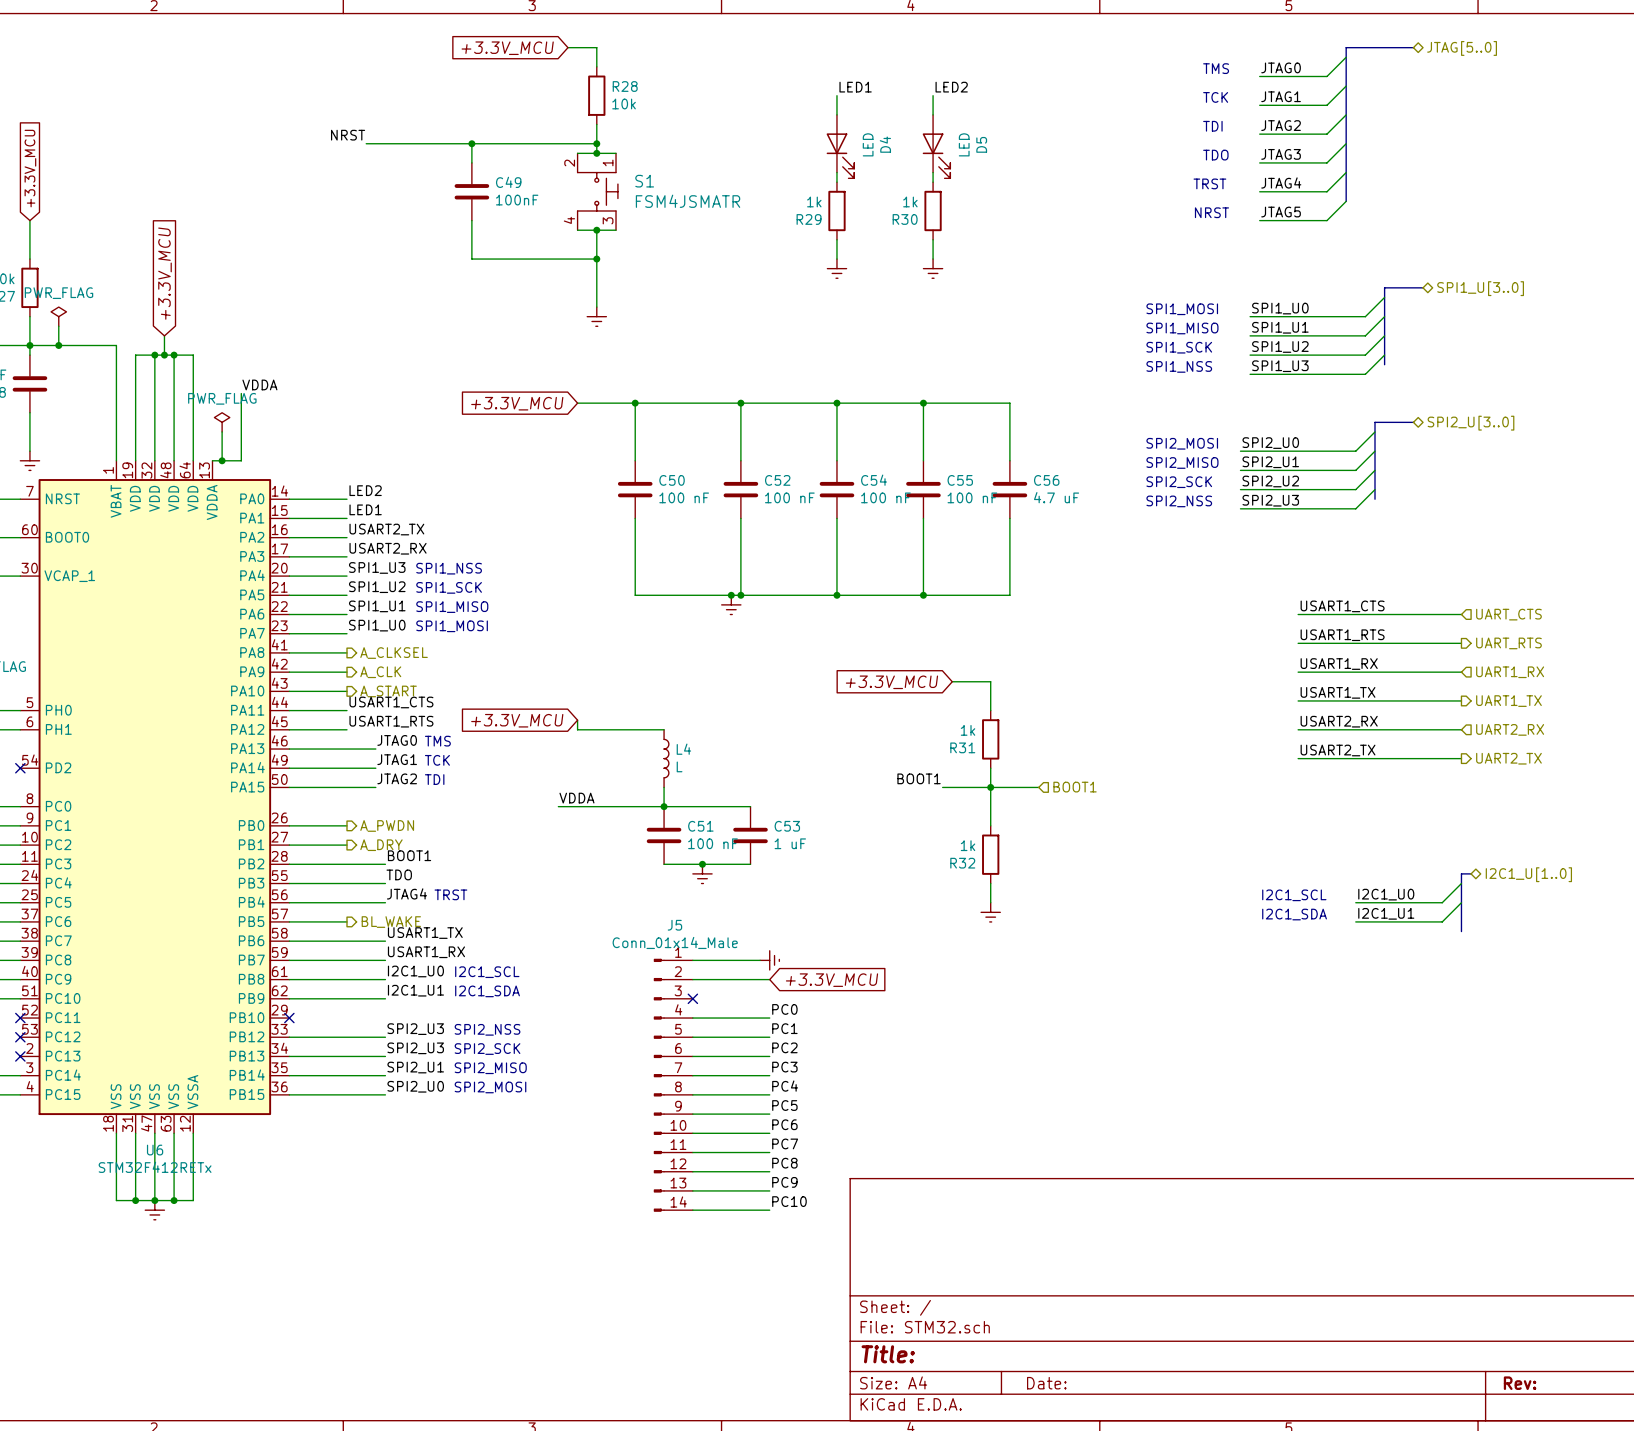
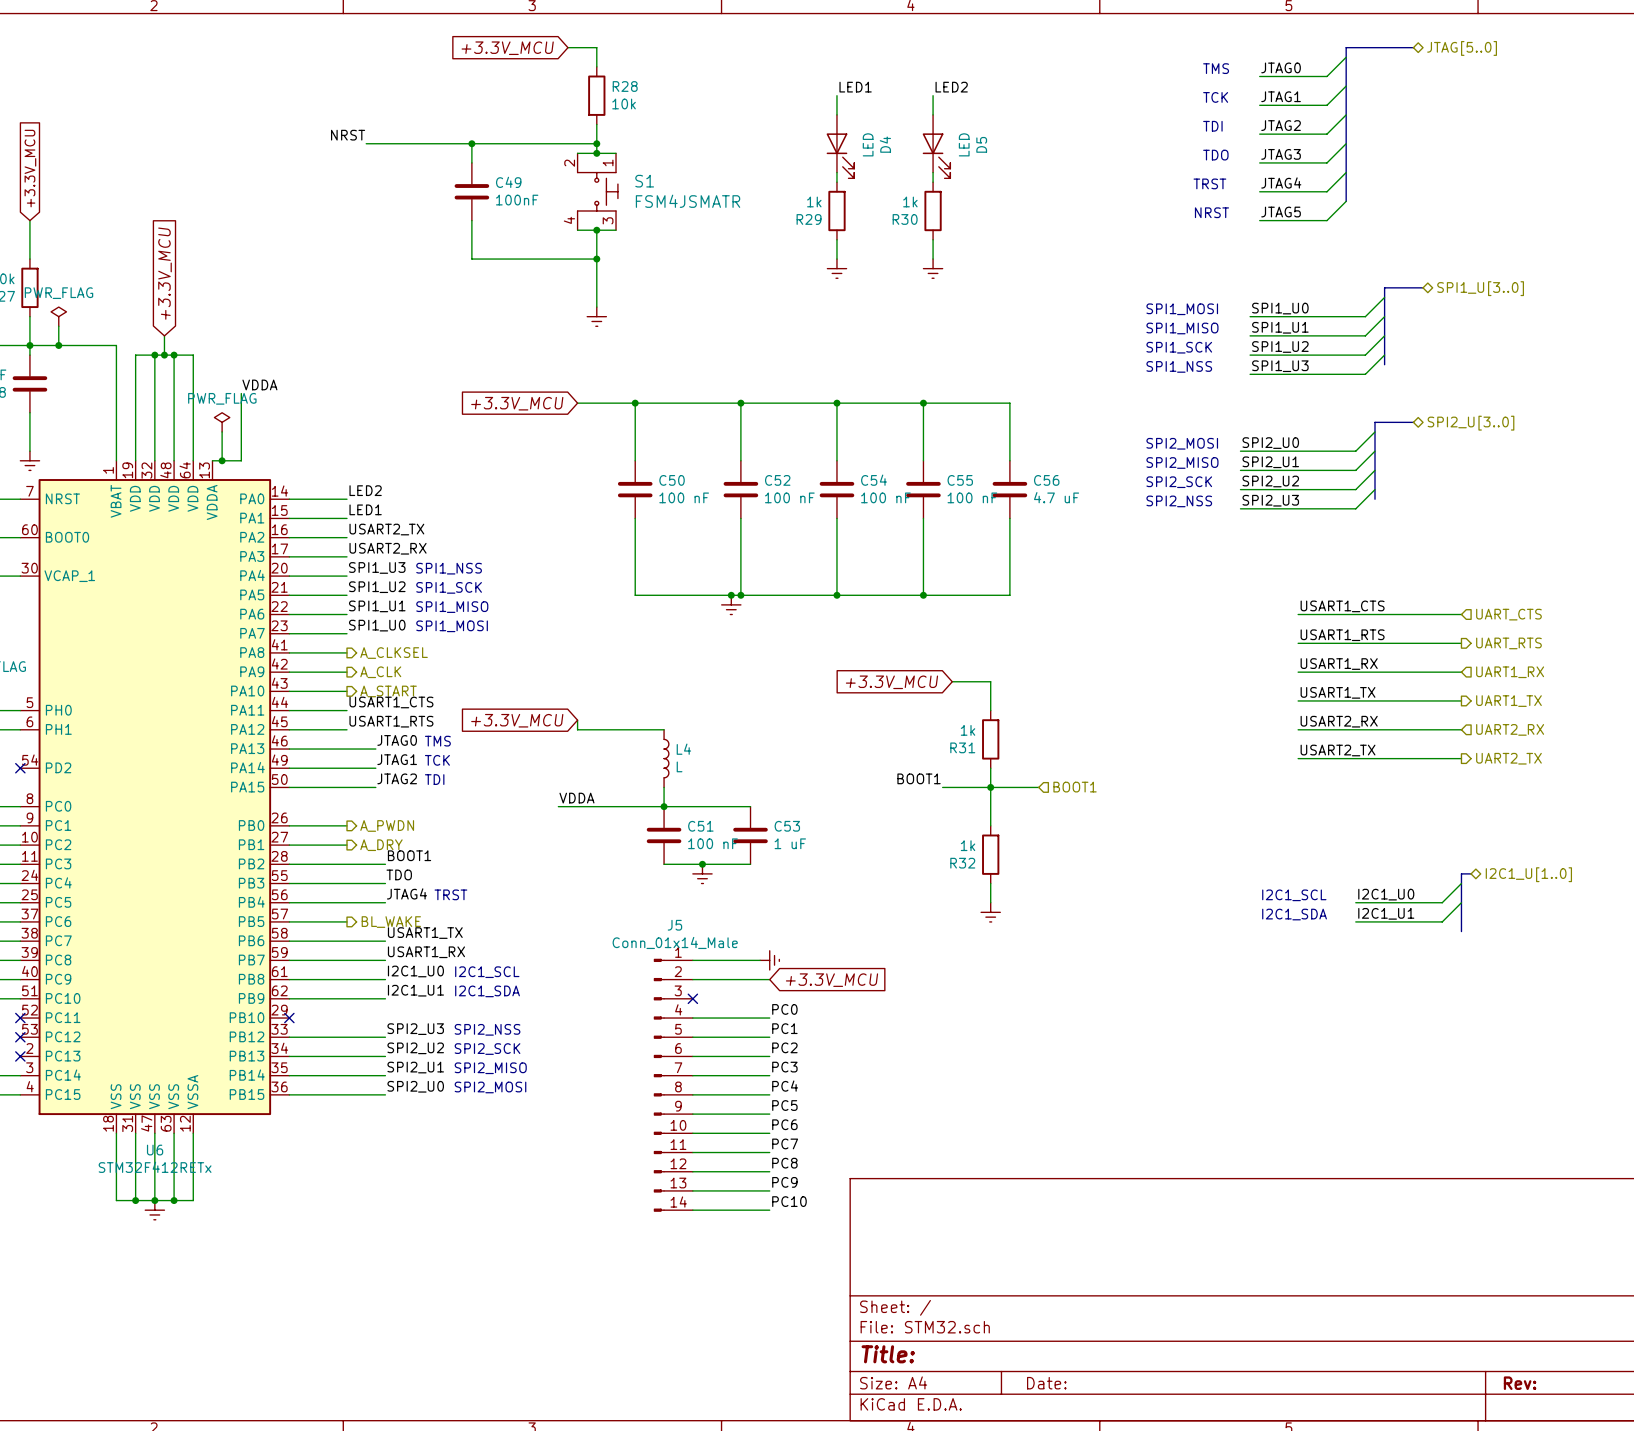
label: SPI2_U3 (415, 1048) -> SPI2_U2 (415, 1048)

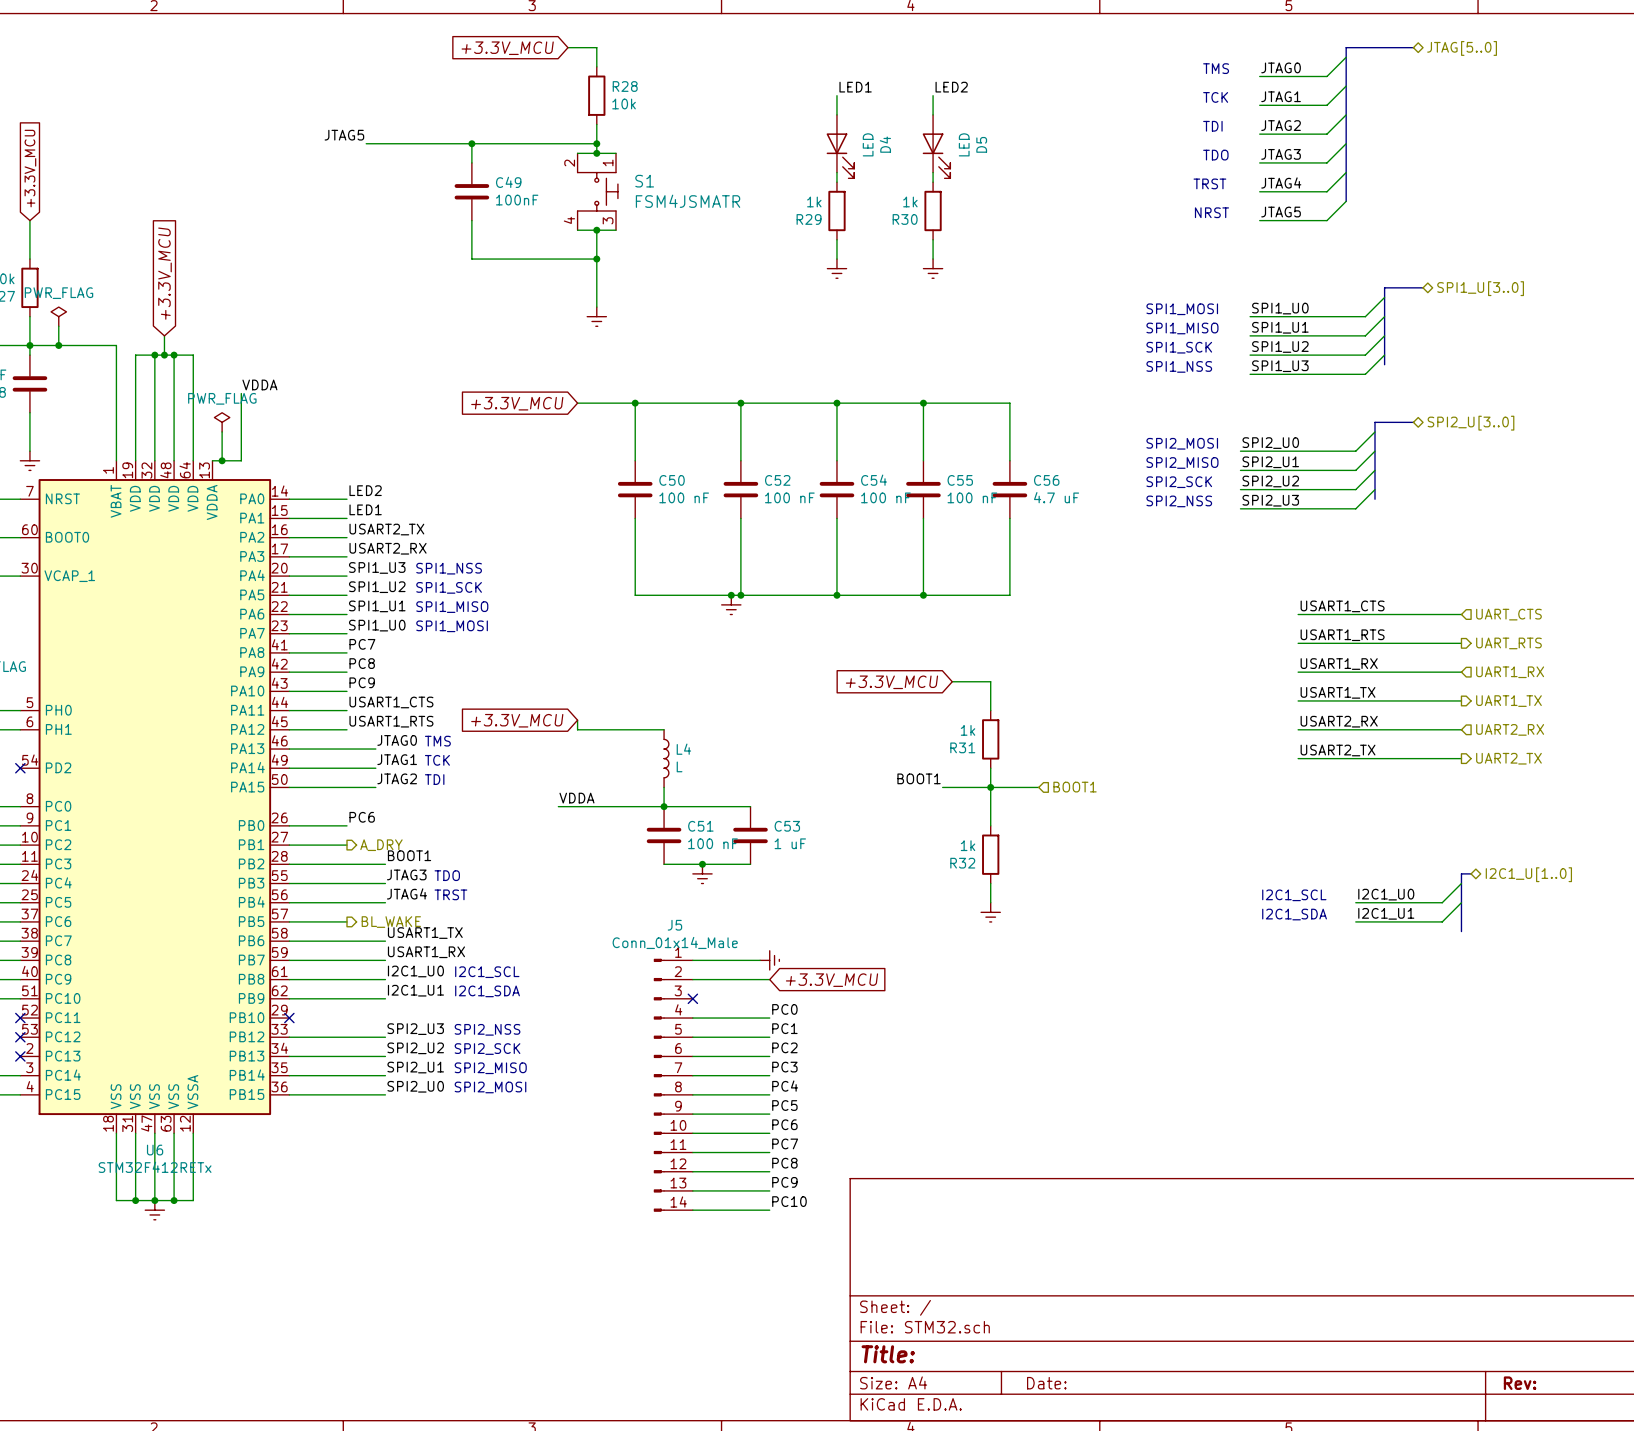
label: NRST (348, 135) -> JTAG5 (344, 135)
label: none -> PC7 (362, 644)
hierarchical label: A_CLKSEL (394, 653) -> none
label: none -> PC8 (362, 663)
hierarchical label: A_CLK (380, 672) -> none
label: none -> PC9 (362, 682)
hierarchical label: A_START (388, 691) -> none
label: none -> PC6 (362, 817)
hierarchical label: A_PWDN (387, 825) -> none
label: TDO (399, 874) -> JTAG3 (406, 874)
text: none -> TDO (447, 875)

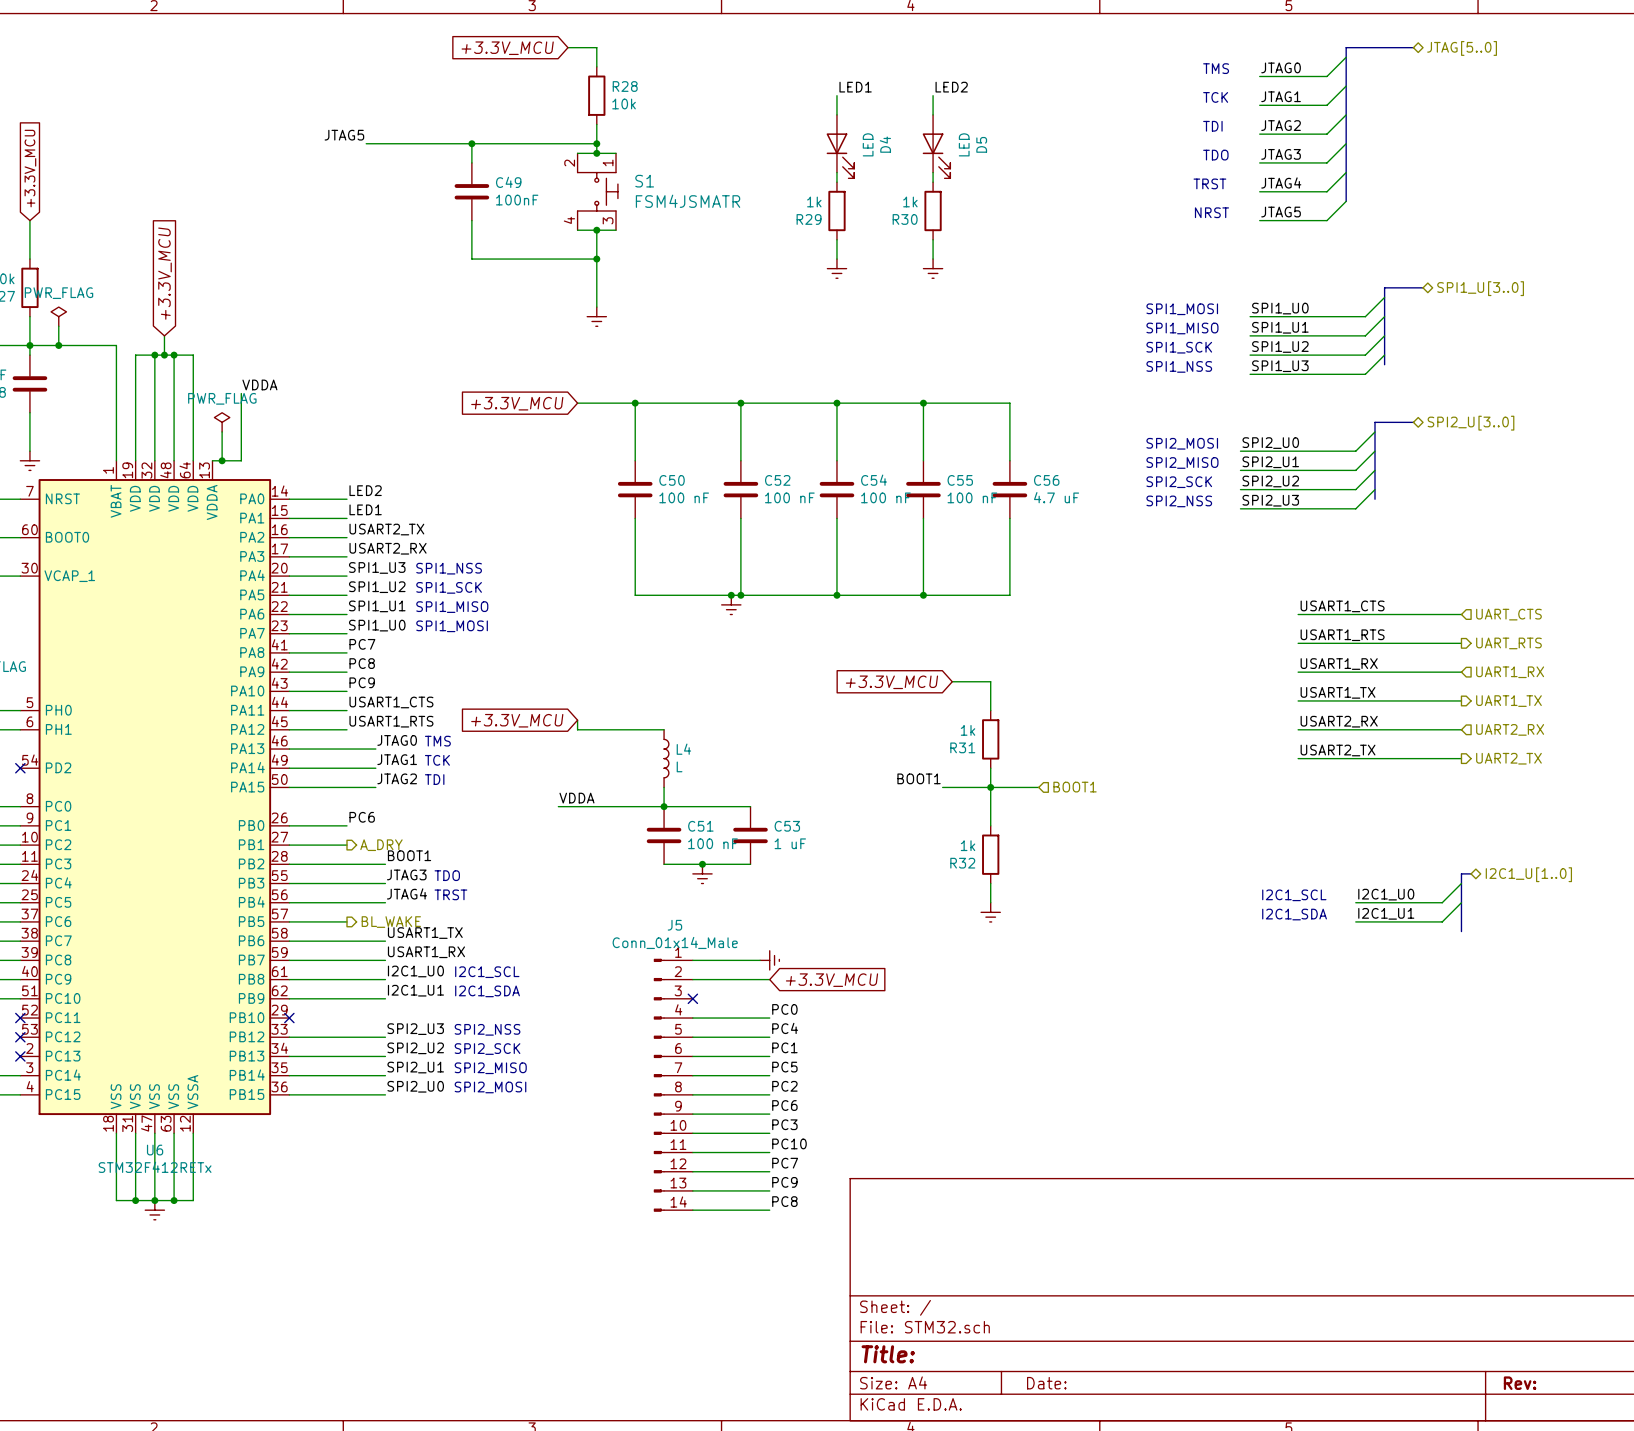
label: PC1 (784, 1028) -> PC4 (785, 1028)
label: PC2 (784, 1047) -> PC1 (784, 1047)
label: PC3 (784, 1067) -> PC5 (784, 1067)
label: PC4 (785, 1086) -> PC2 (784, 1086)
label: PC5 (784, 1105) -> PC6 (784, 1105)
label: PC6 (784, 1124) -> PC3 (784, 1124)
label: PC7 (785, 1143) -> PC10 (789, 1143)
label: PC8 (784, 1163) -> PC7 (785, 1163)
label: PC10 (789, 1201) -> PC8 (784, 1201)

